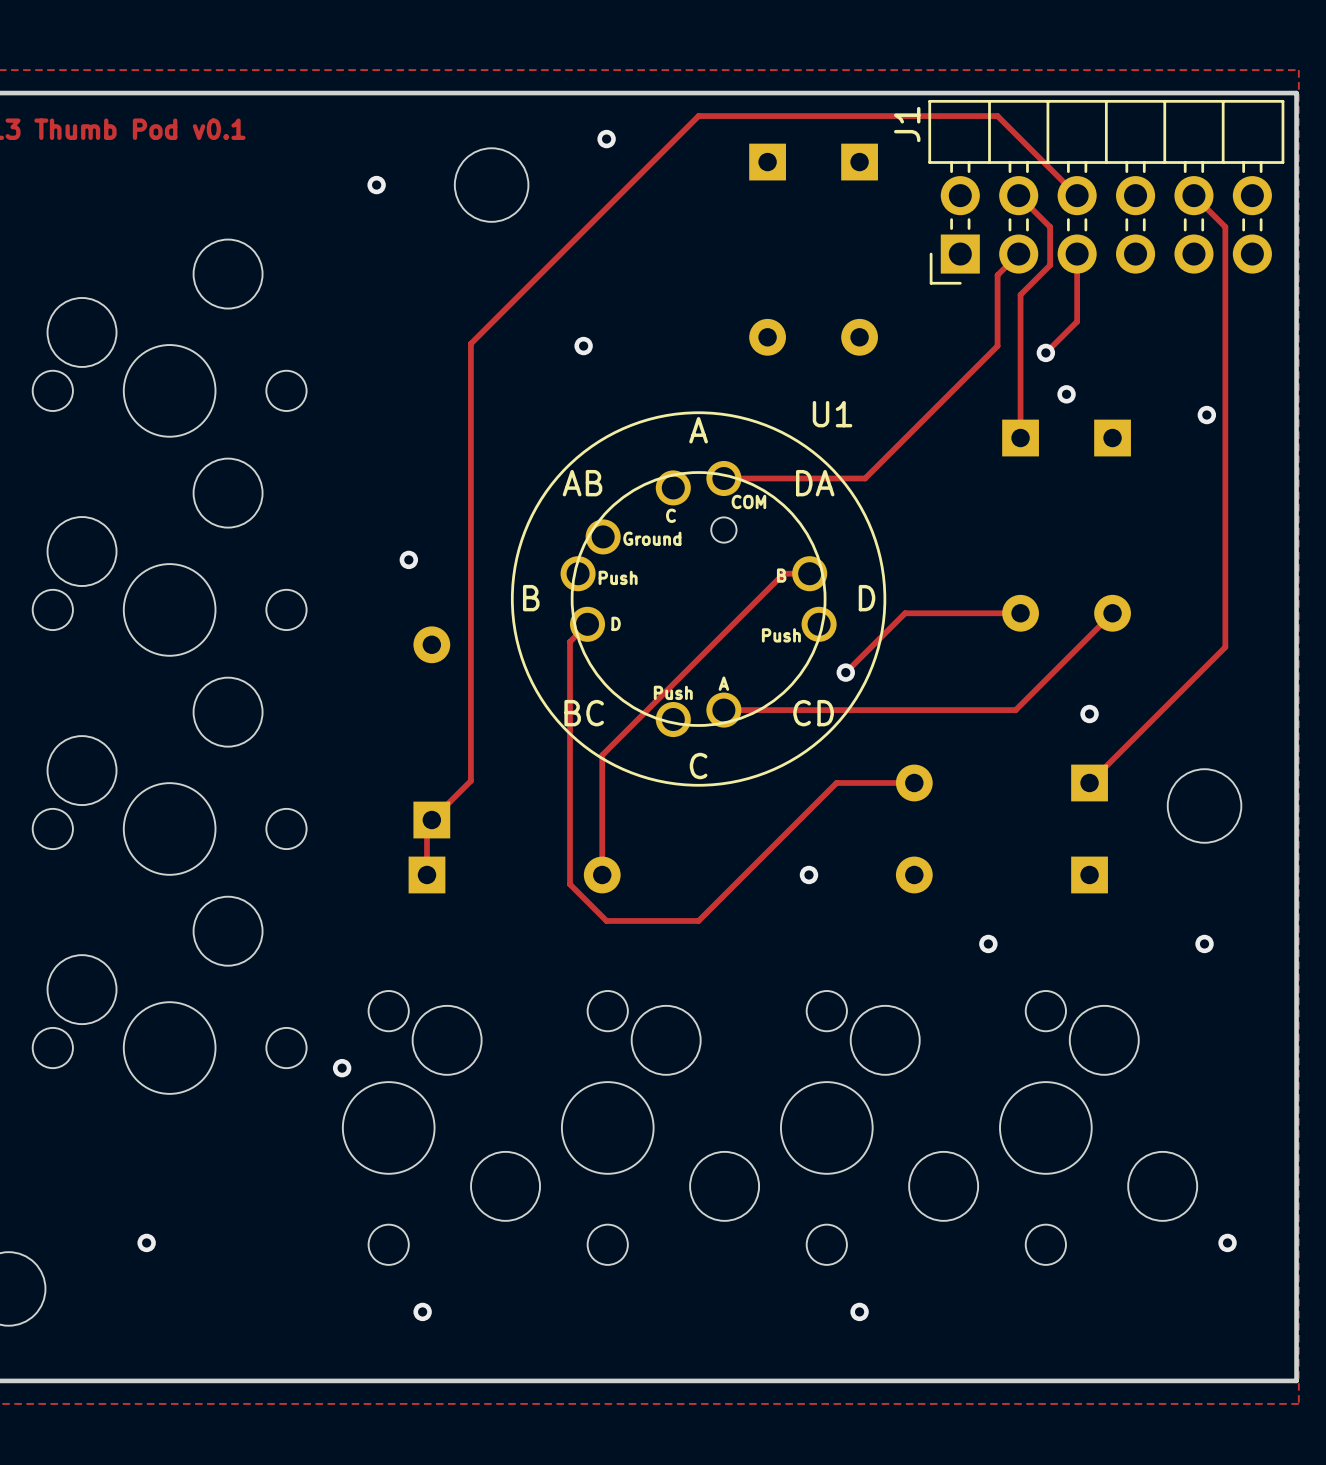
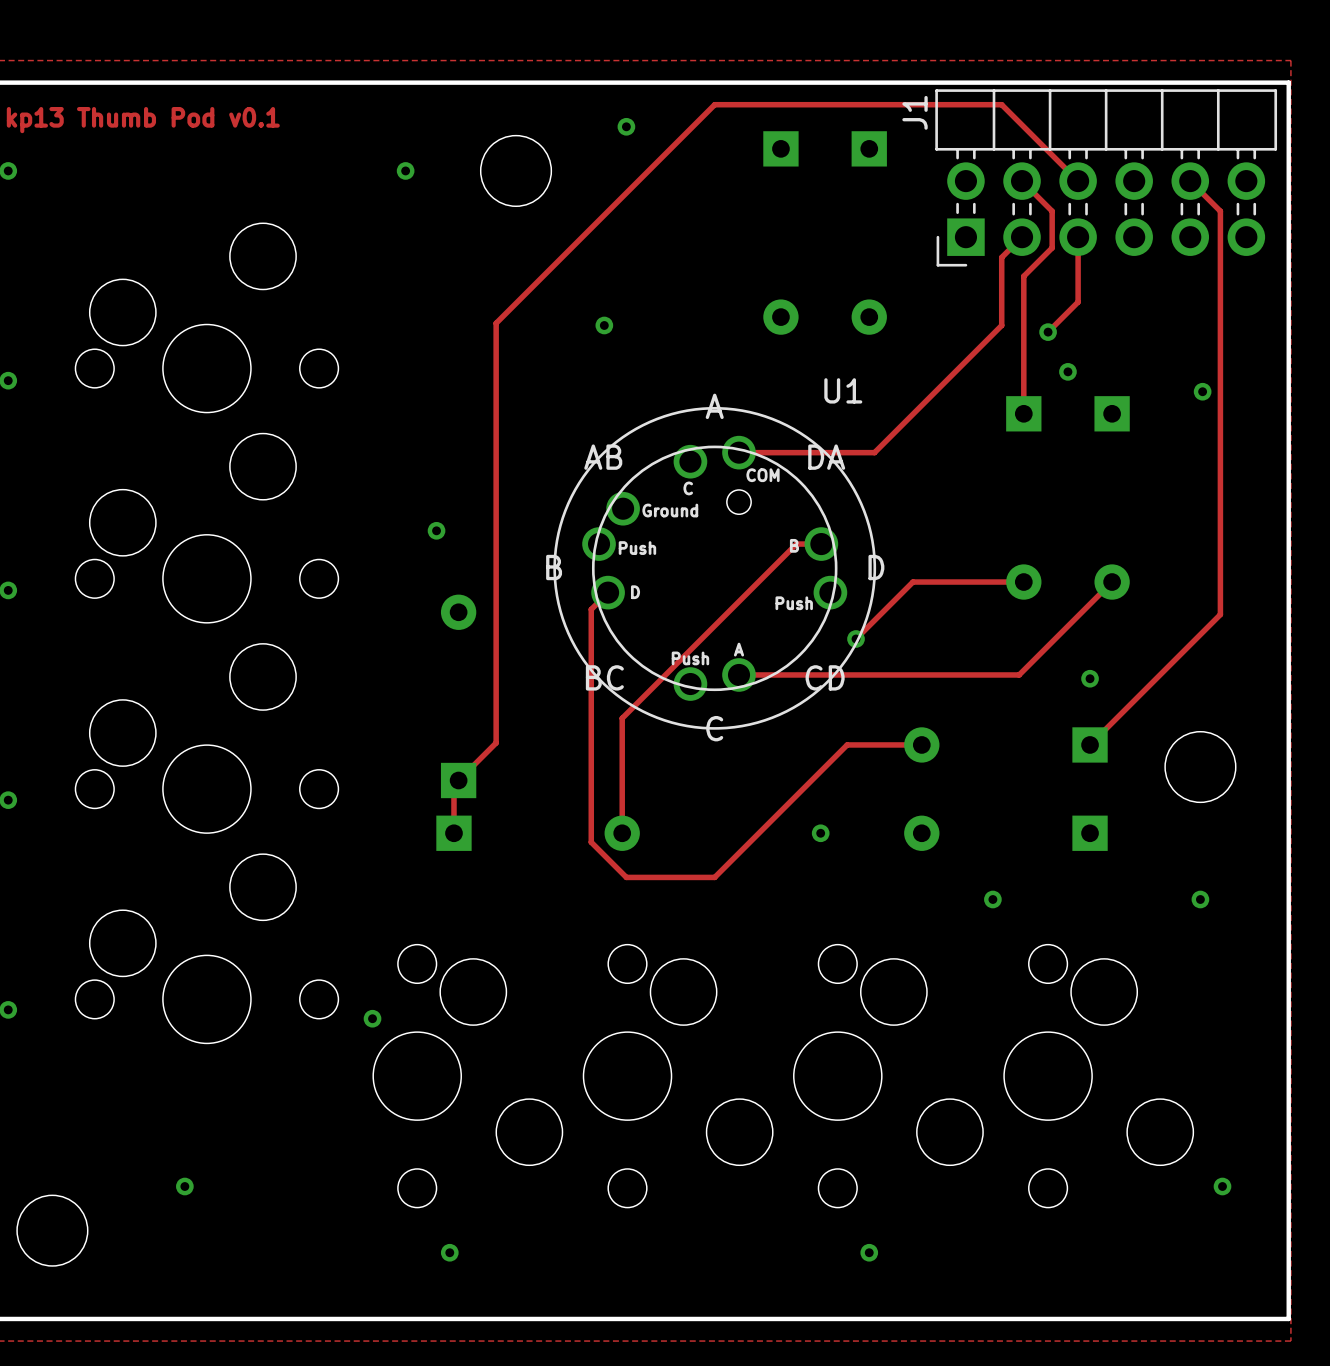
U1 footprint: [510, 411, 887, 787] -> [553, 406, 877, 730]

